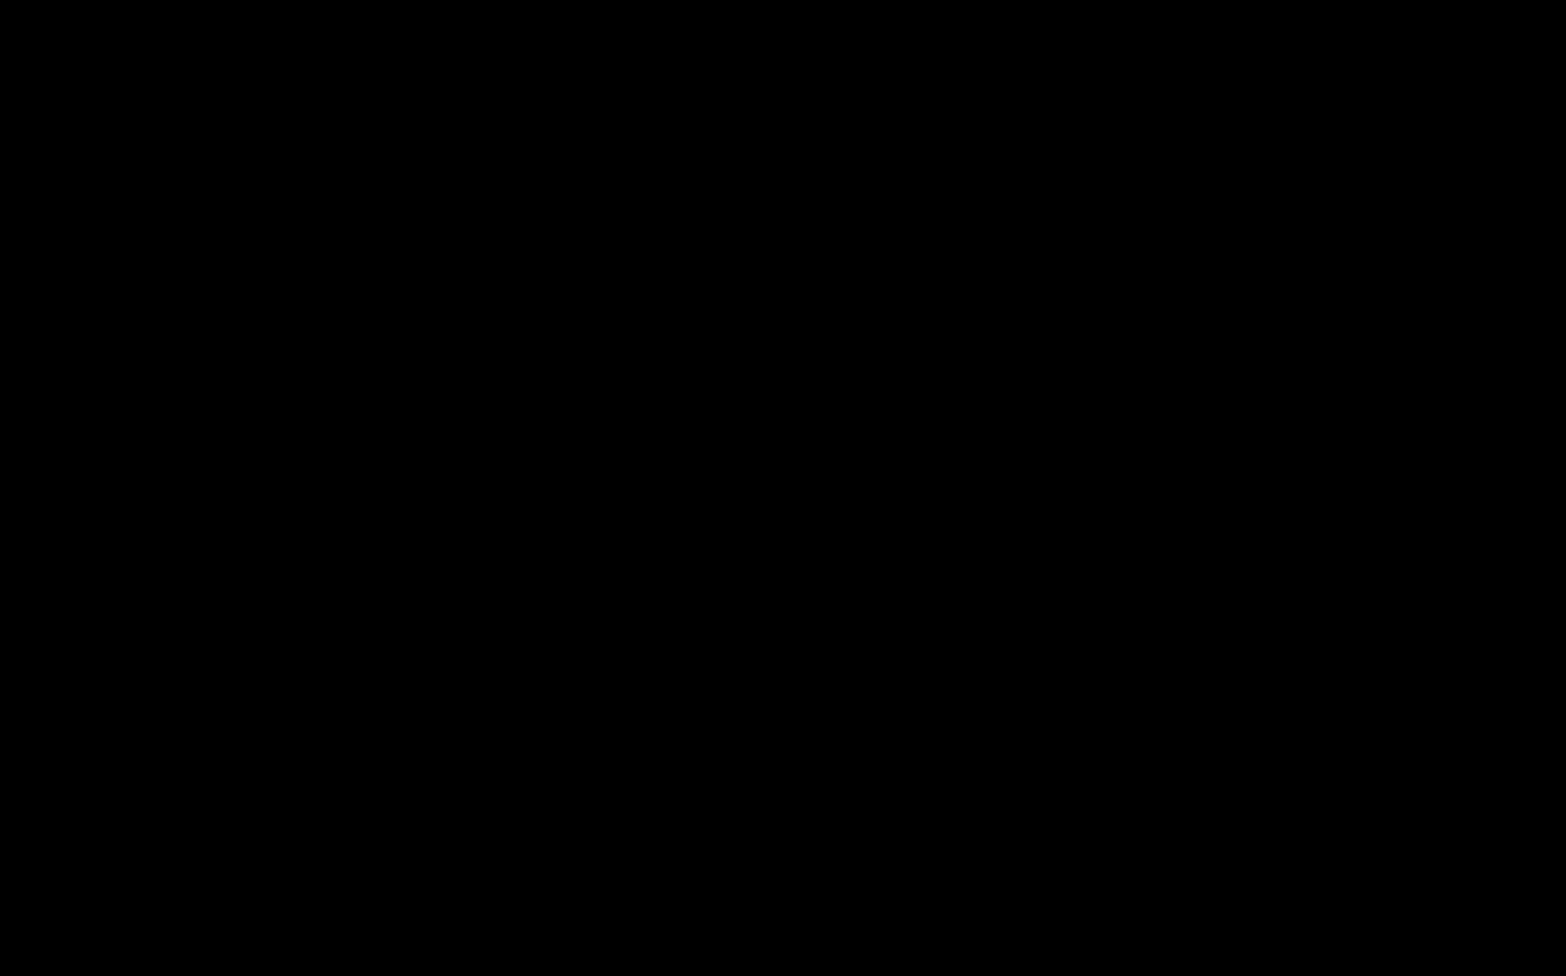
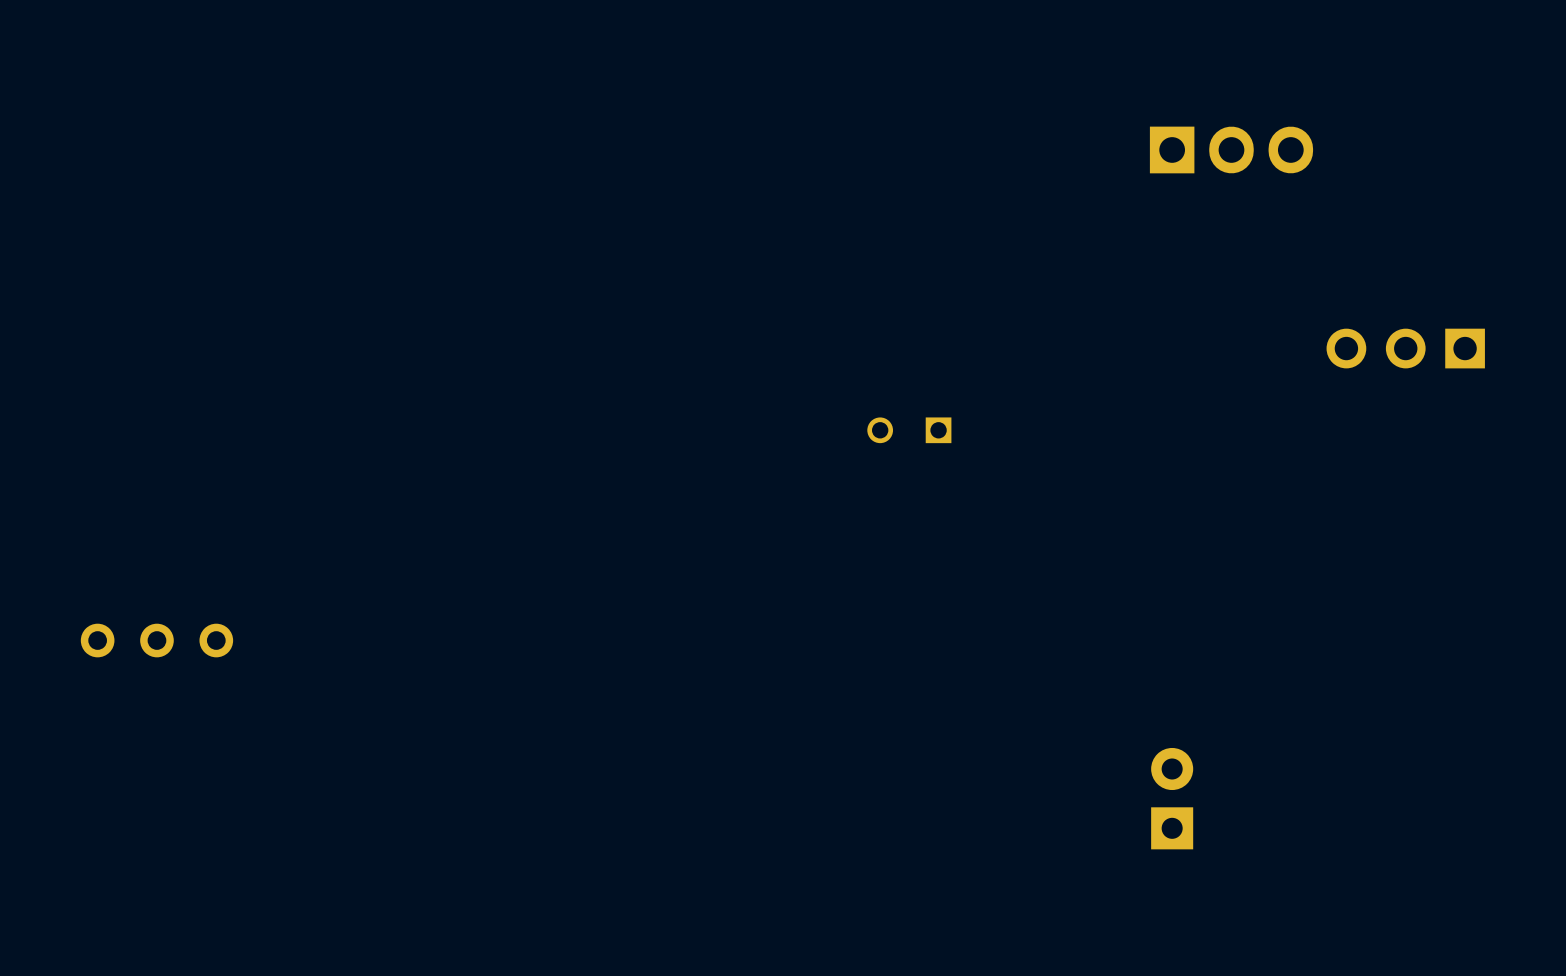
part: none -> (1231, 149)
part: none -> (1405, 348)
part: none -> (909, 430)
part: none -> (156, 640)
part: none -> (1172, 798)

